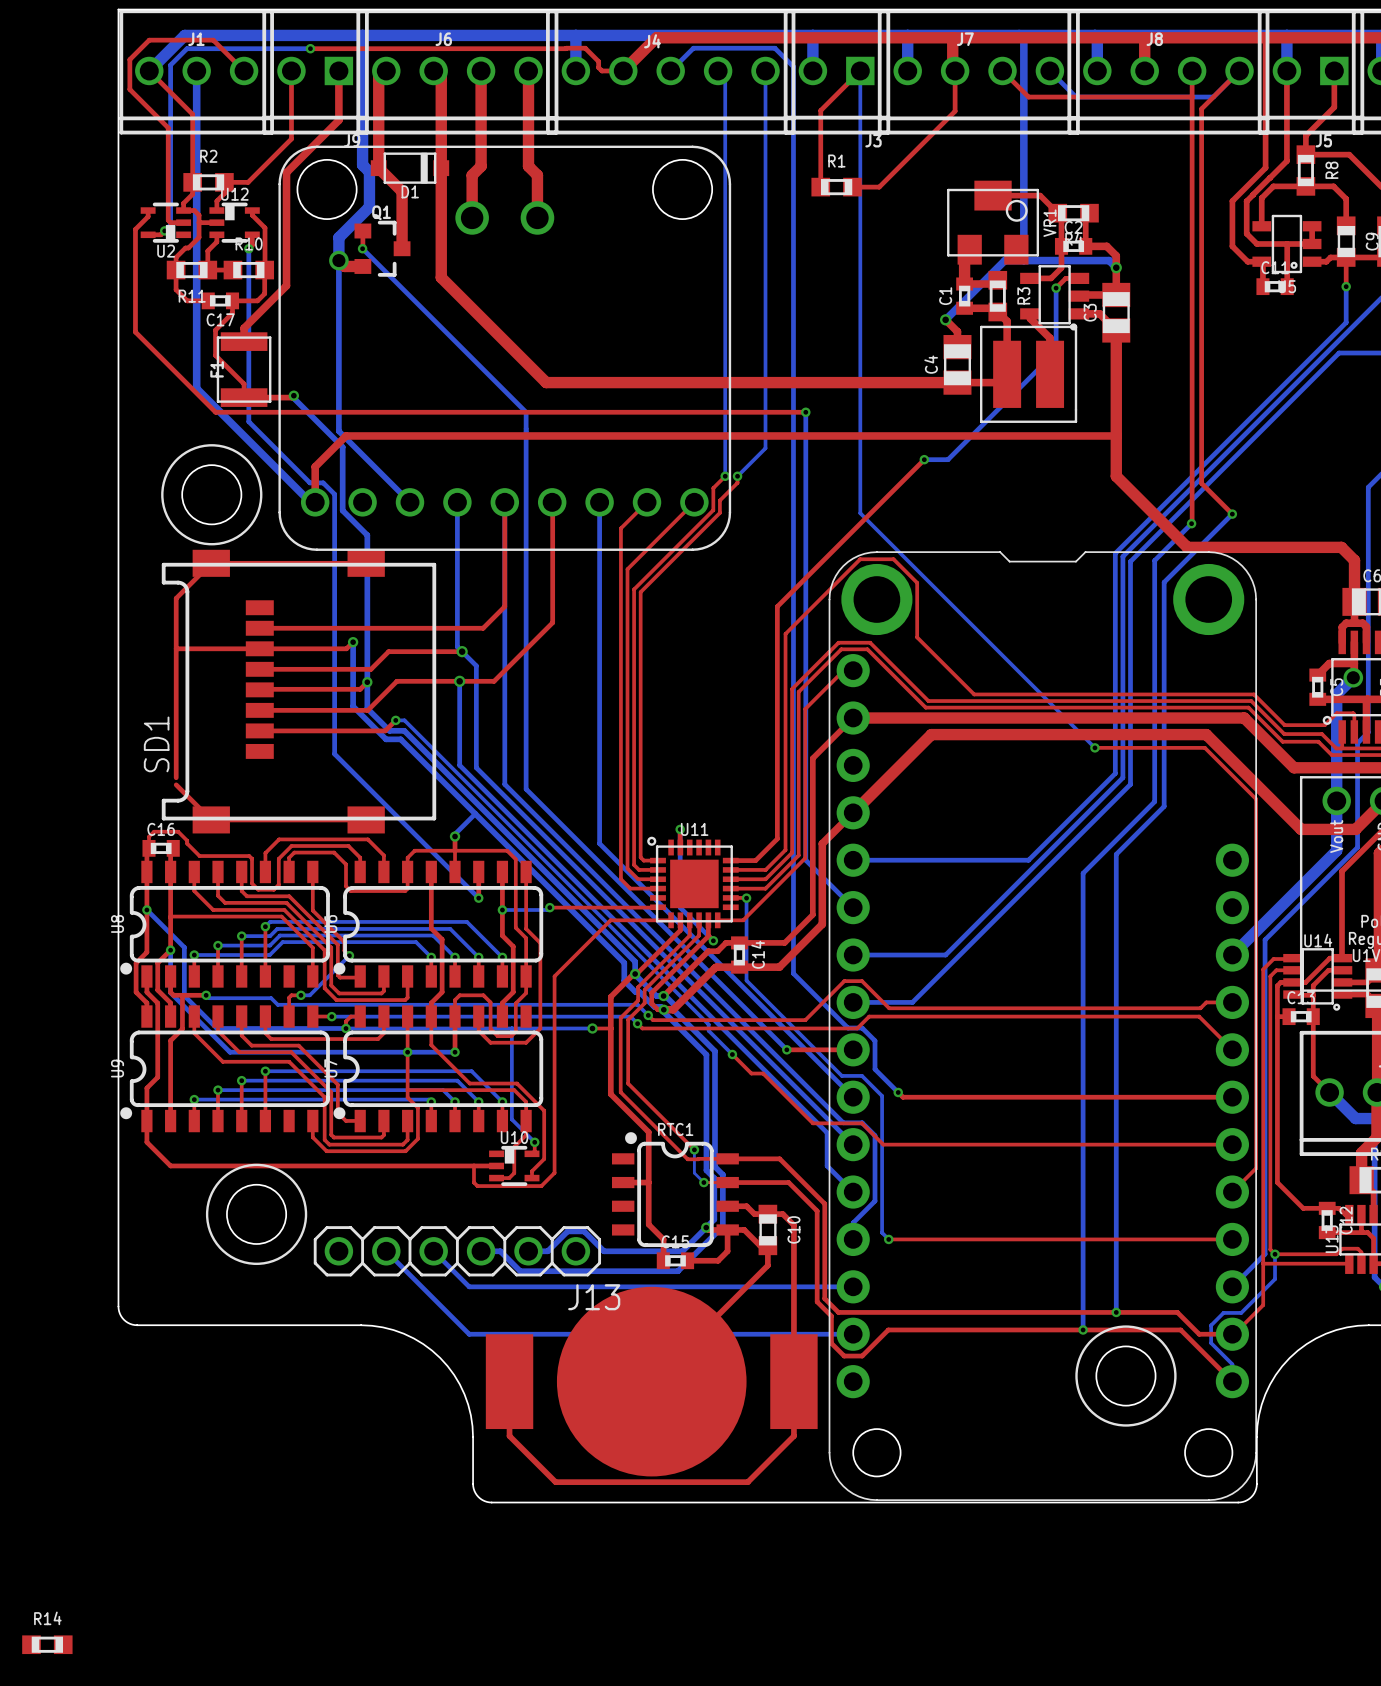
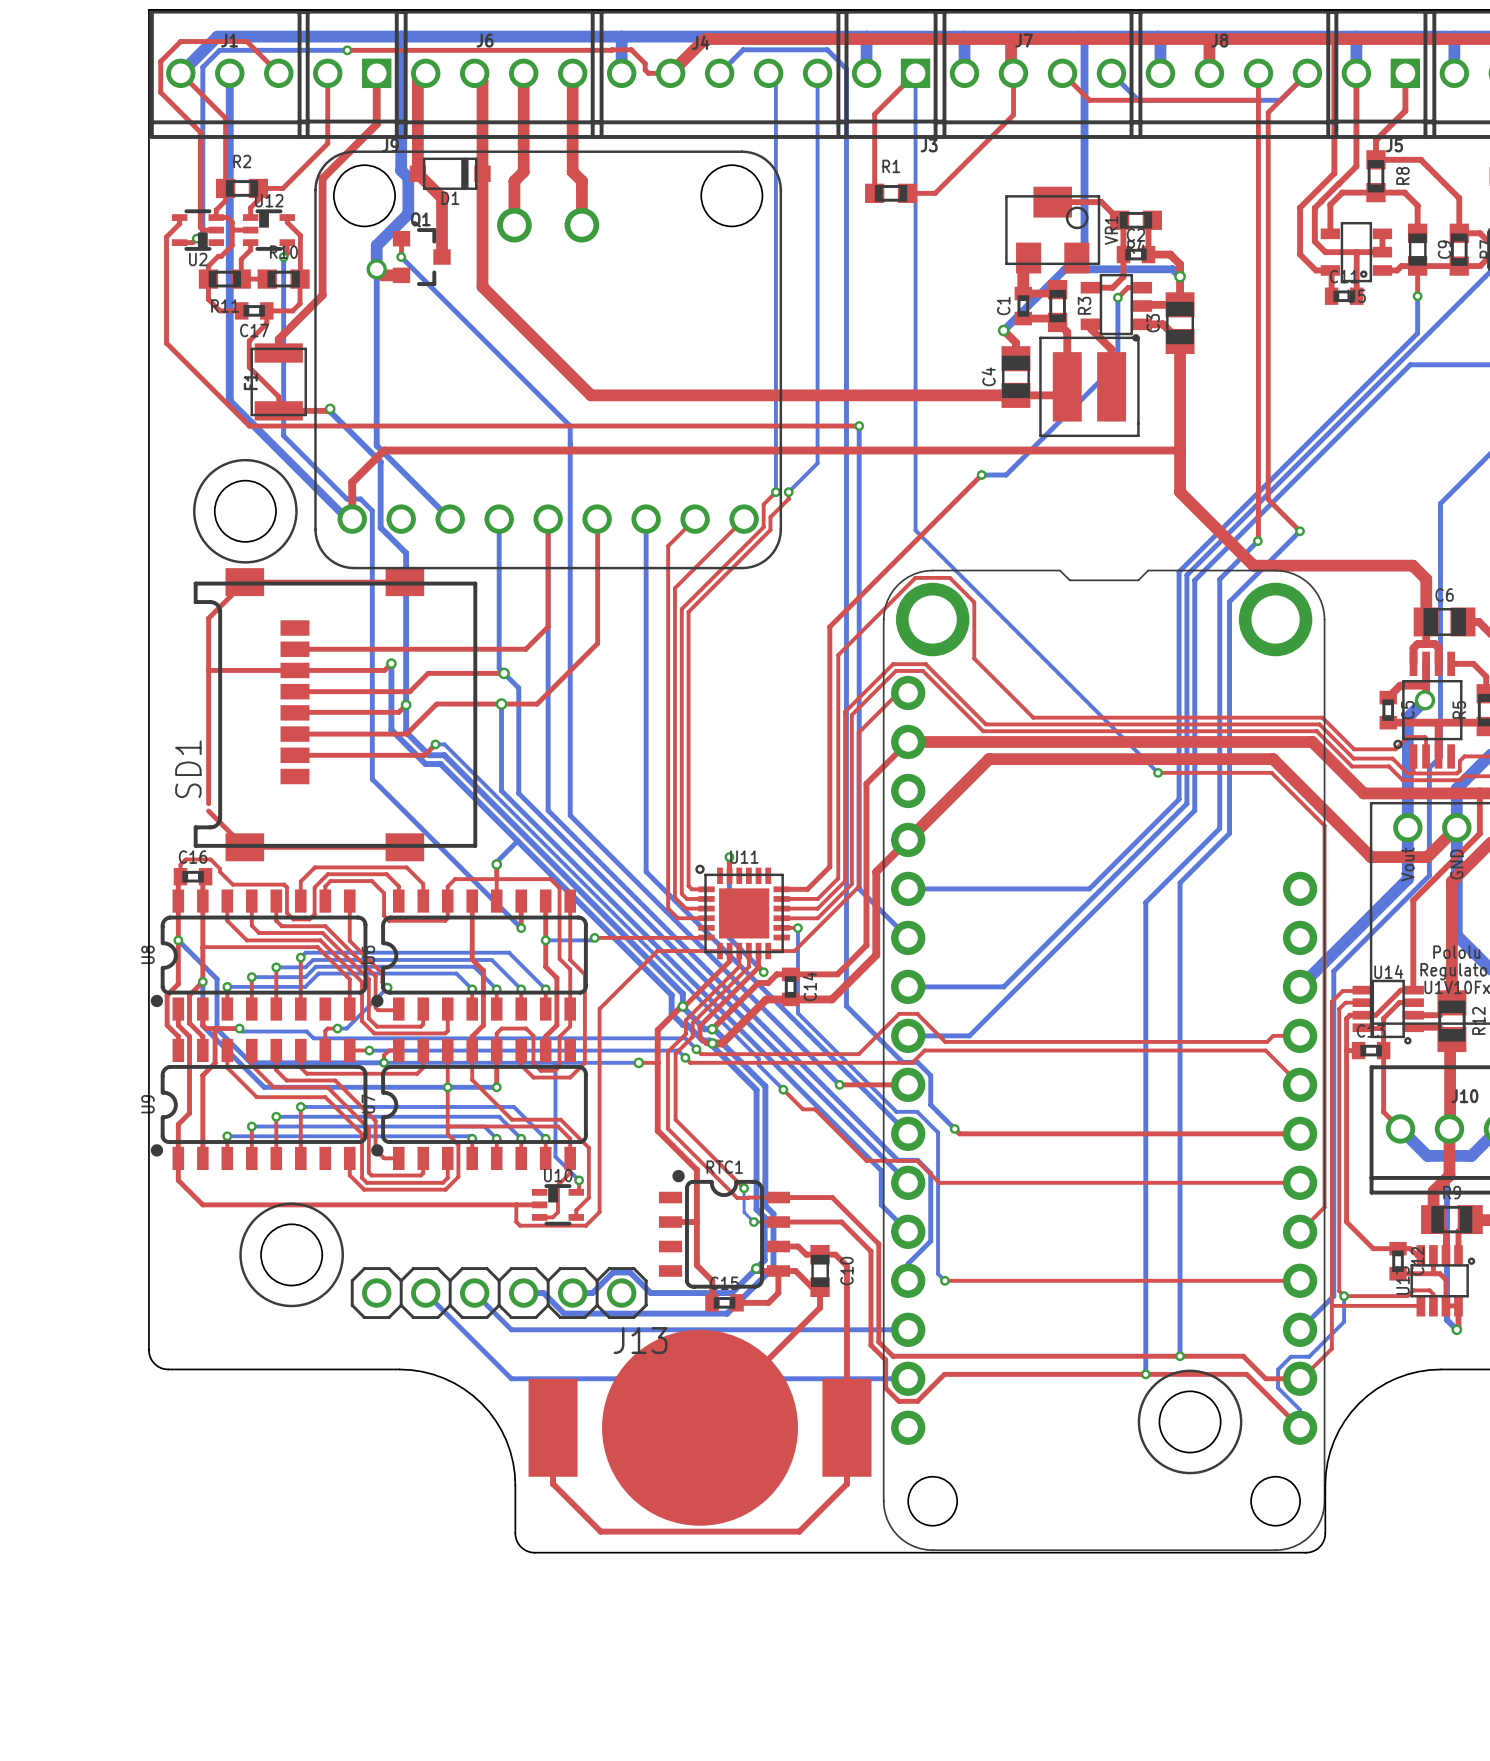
R14: (47, 1644) -> none

